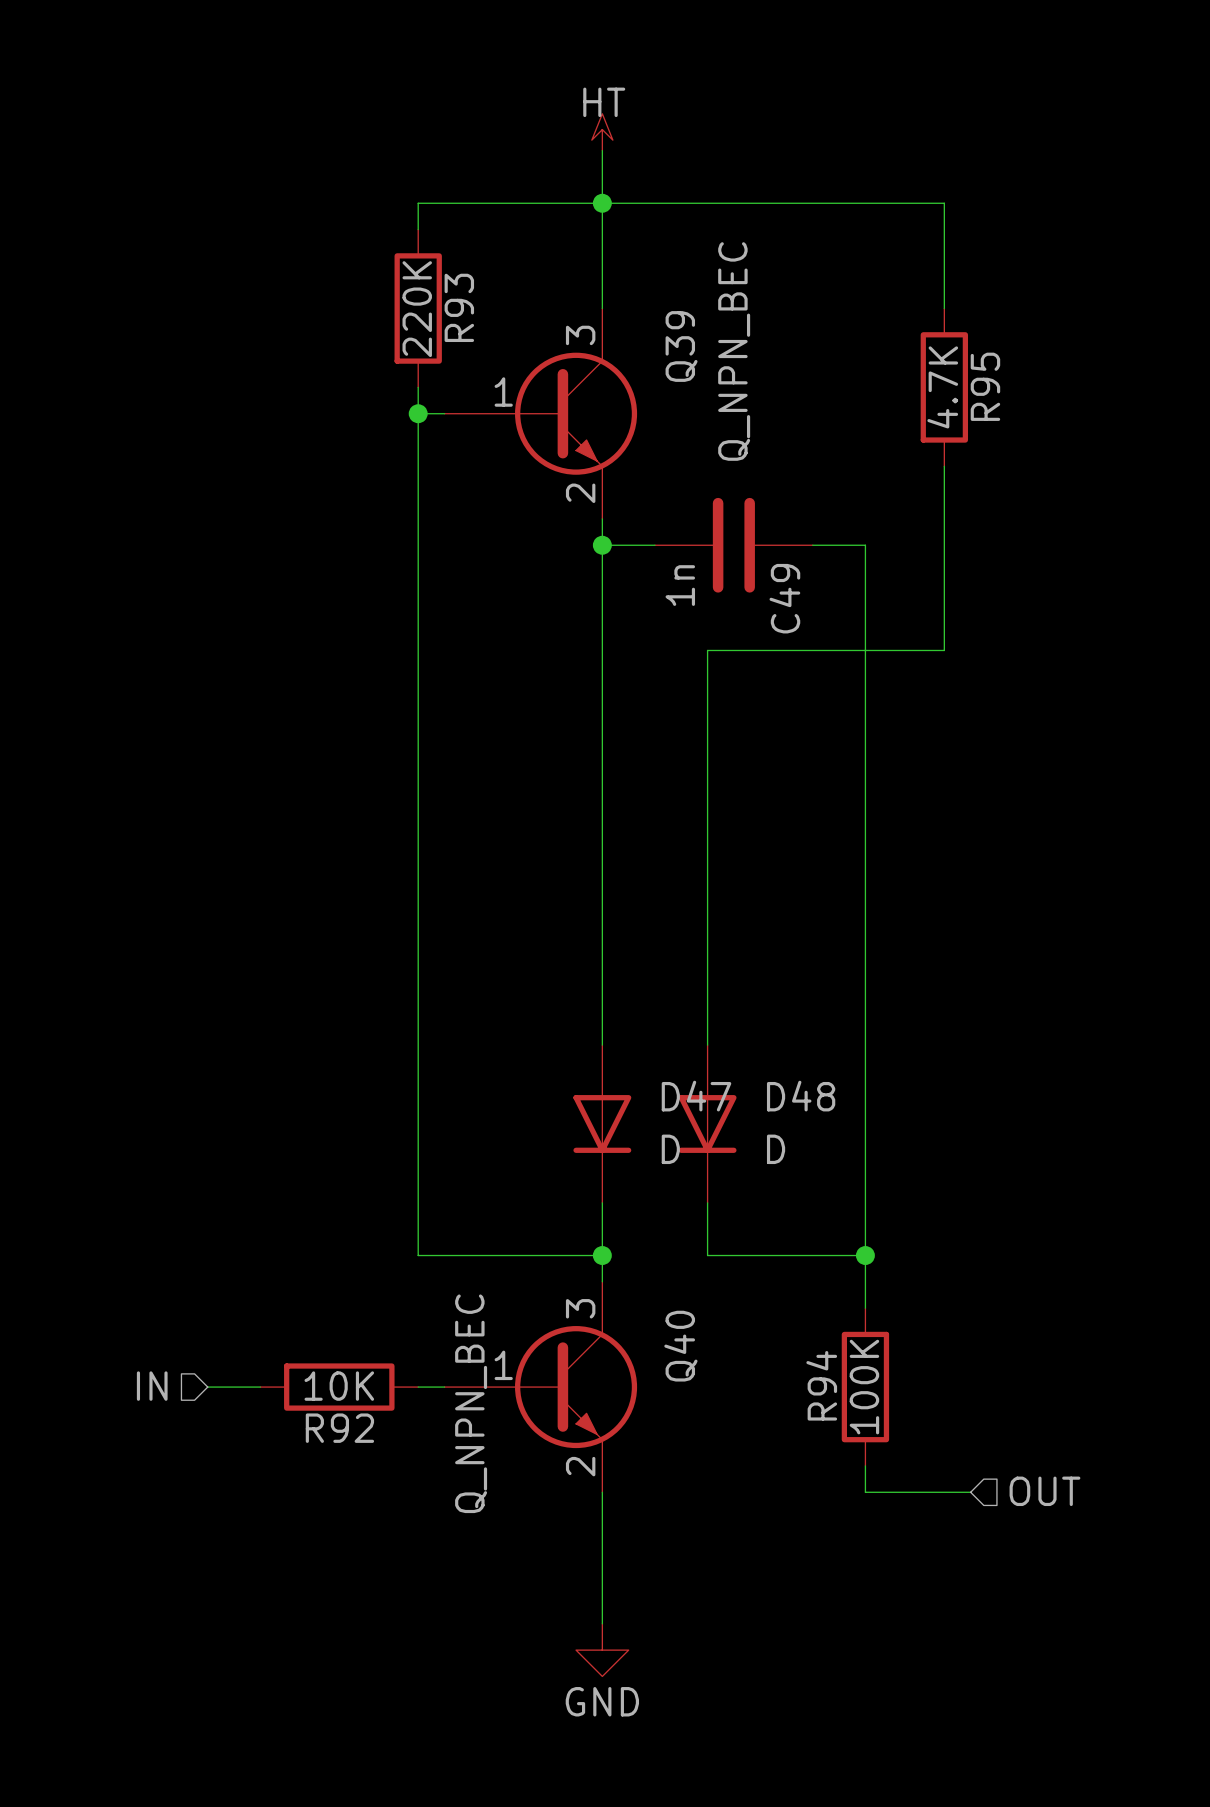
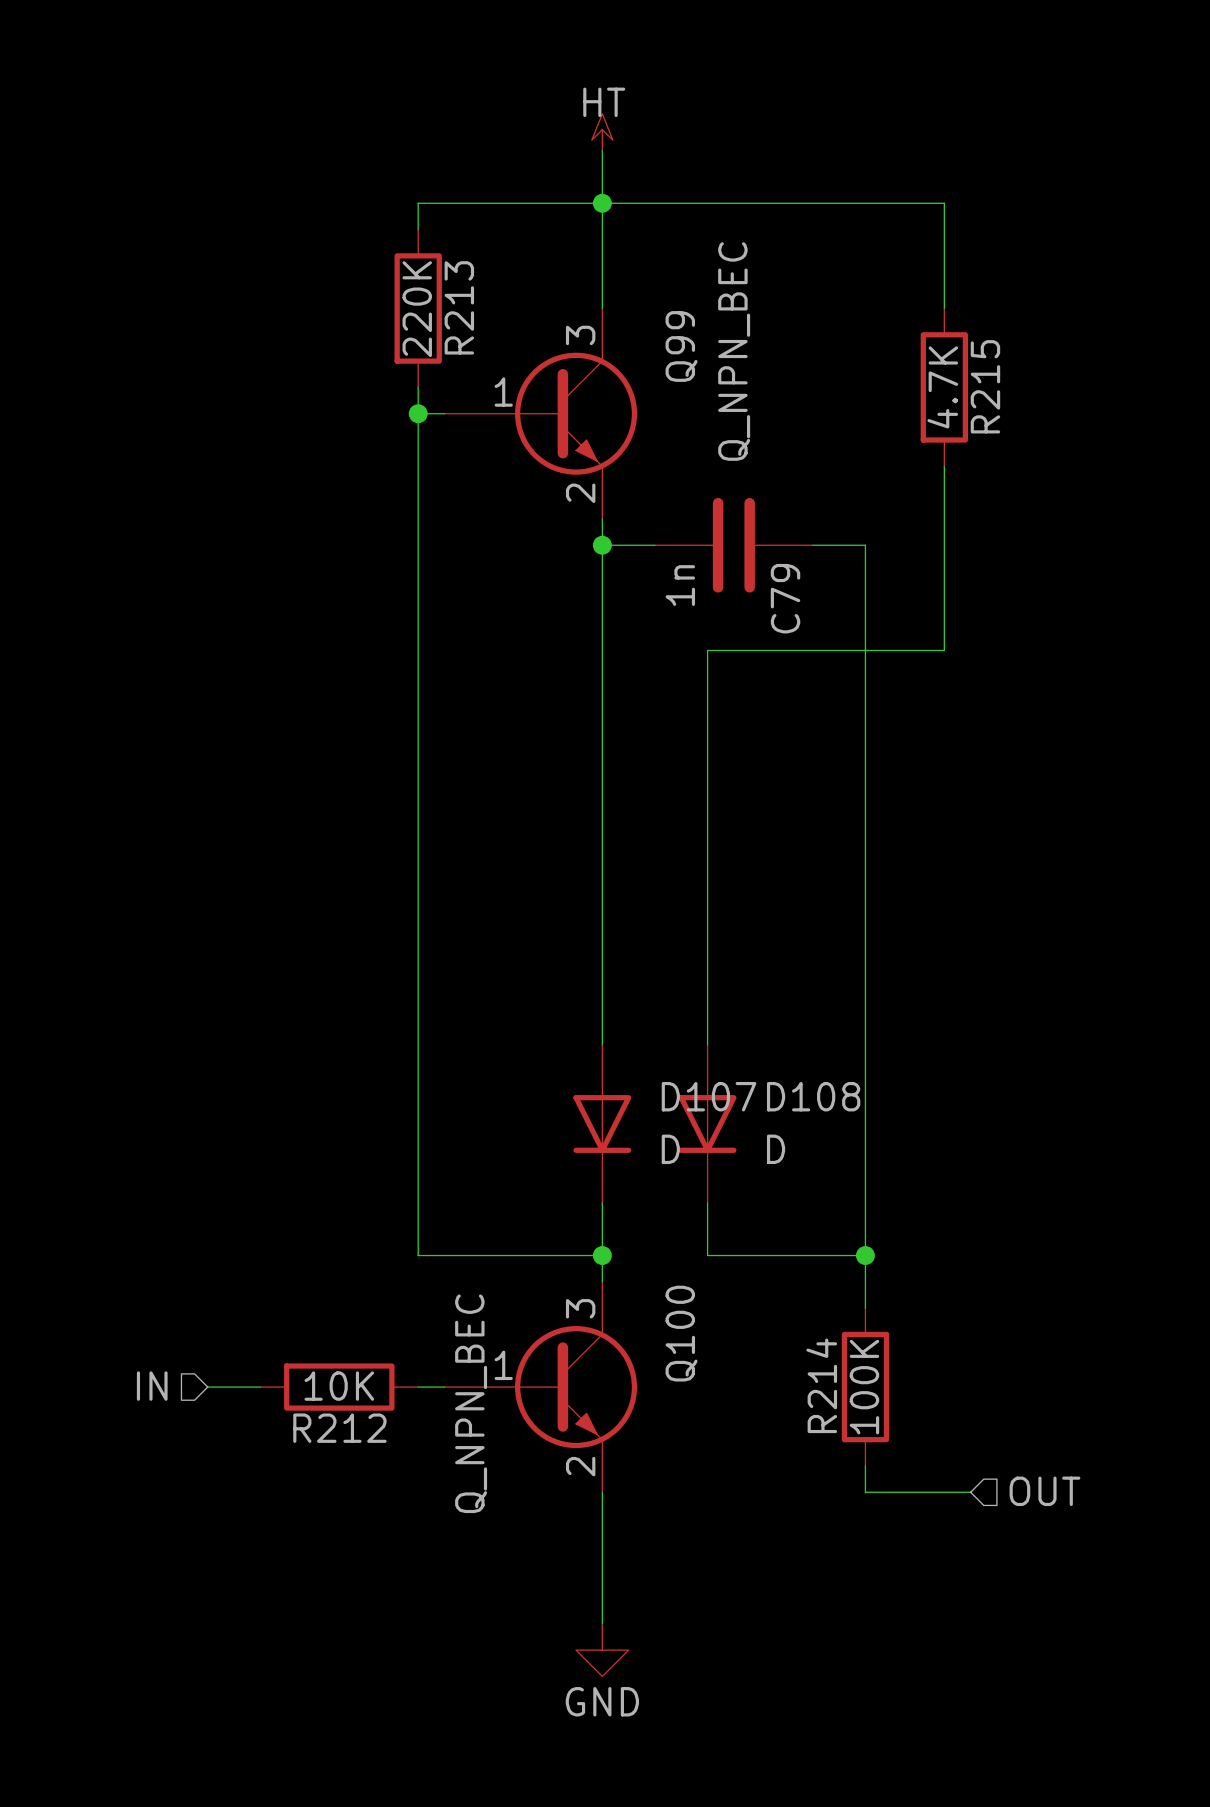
R93 name: R93 (459, 307) -> R213 (459, 307)
Q39 name: Q39 (681, 346) -> Q99 (681, 346)
R95 name: R95 (985, 386) -> R215 (985, 386)
C49 name: C49 (784, 598) -> C79 (785, 598)
D47 name: D47 (696, 1096) -> D107 (709, 1096)
D48 name: D48 (801, 1096) -> D108 (813, 1096)
Q40 name: Q40 (680, 1346) -> Q100 (681, 1333)
R94 name: R94 (821, 1385) -> R214 (821, 1385)
R92 name: R92 (339, 1428) -> R212 (339, 1428)

